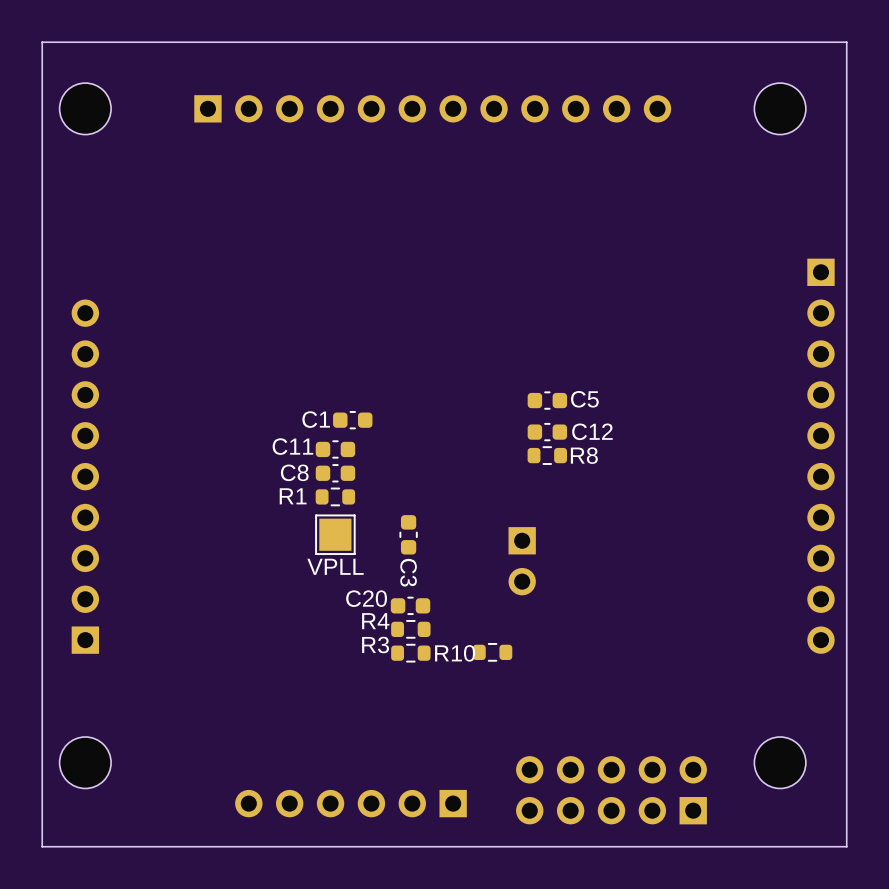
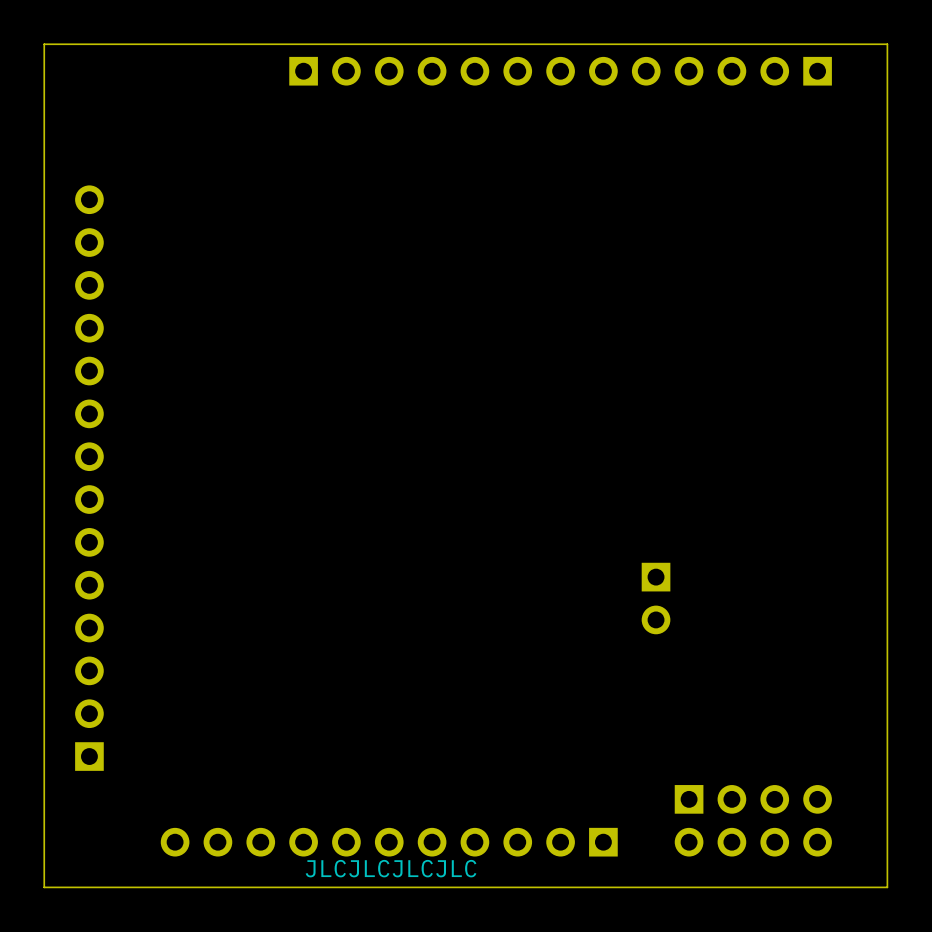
part: none -> (474, 71)
part: none -> (753, 71)
part: (85, 108) -> none
part: (432, 108) -> none
part: (780, 108) -> none
C5: (547, 400) -> none
C1: (352, 420) -> none
C12: (547, 432) -> none
C11: (335, 449) -> none
R8: (547, 455) -> none
part: none -> (89, 478)
part: (820, 456) -> none
C8: (335, 473) -> none
part: (85, 476) -> none
R1: (335, 496) -> none
part: VPLL (335, 534) -> none
C3: (408, 534) -> none
part position: (522, 561) -> (656, 598)
C20: (410, 605) -> none
R4: (410, 629) -> none
R10: (492, 652) -> none
R3: (410, 653) -> none
part: (85, 762) -> none
part: (780, 762) -> none
part: none -> (753, 820)
part: (611, 790) -> none
part: (350, 803) -> none
part: none -> (389, 842)
text: none -> JLCJLCJLCJLC (391, 868)

